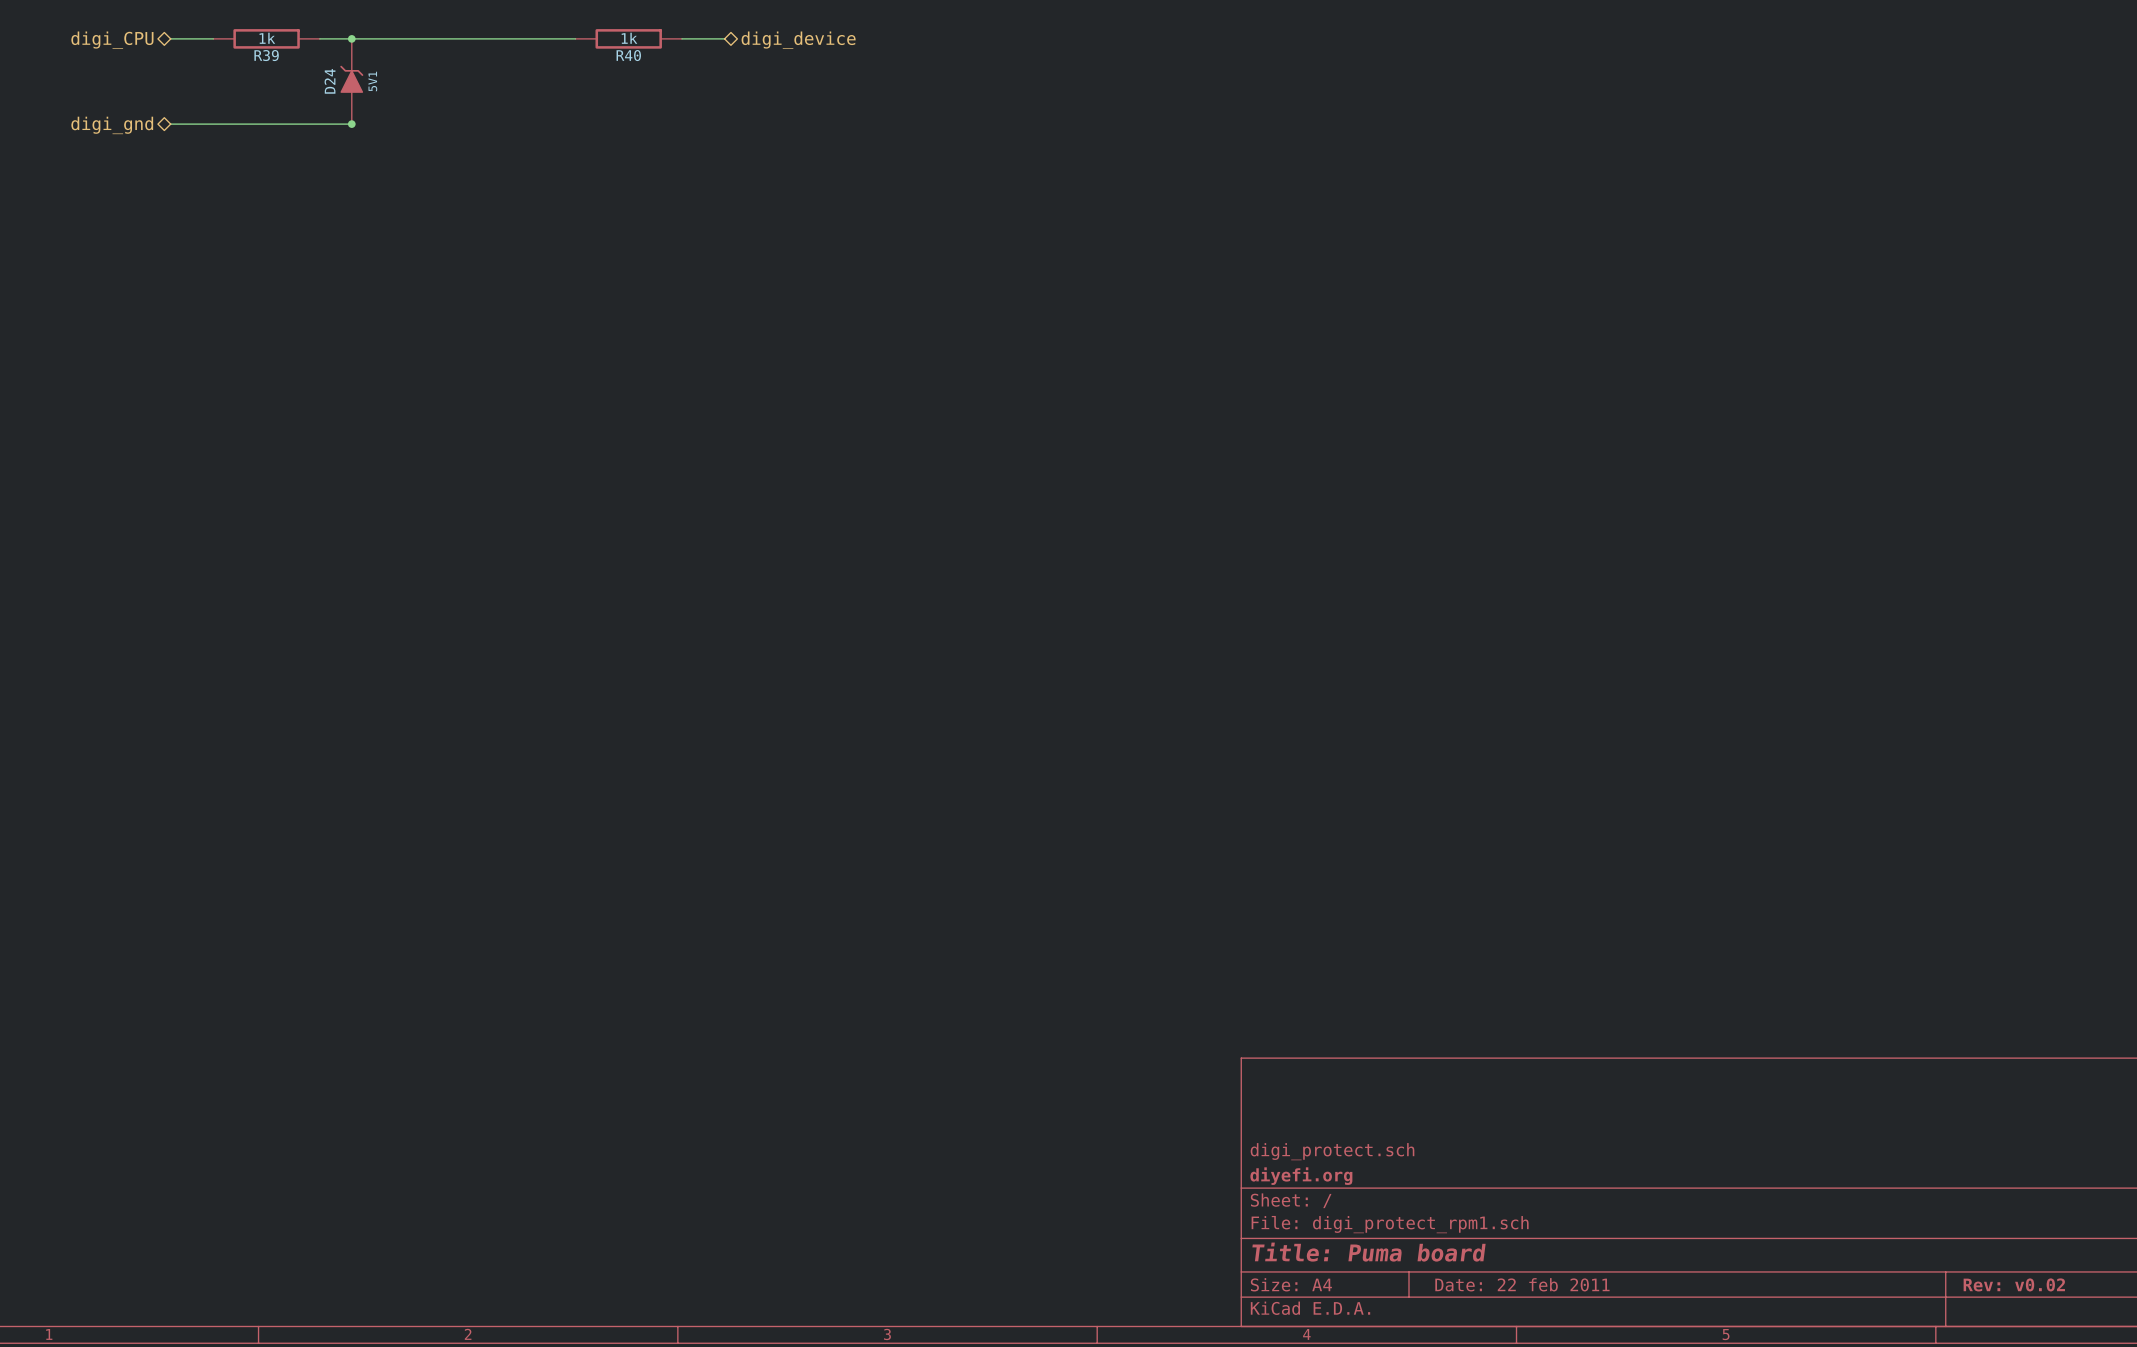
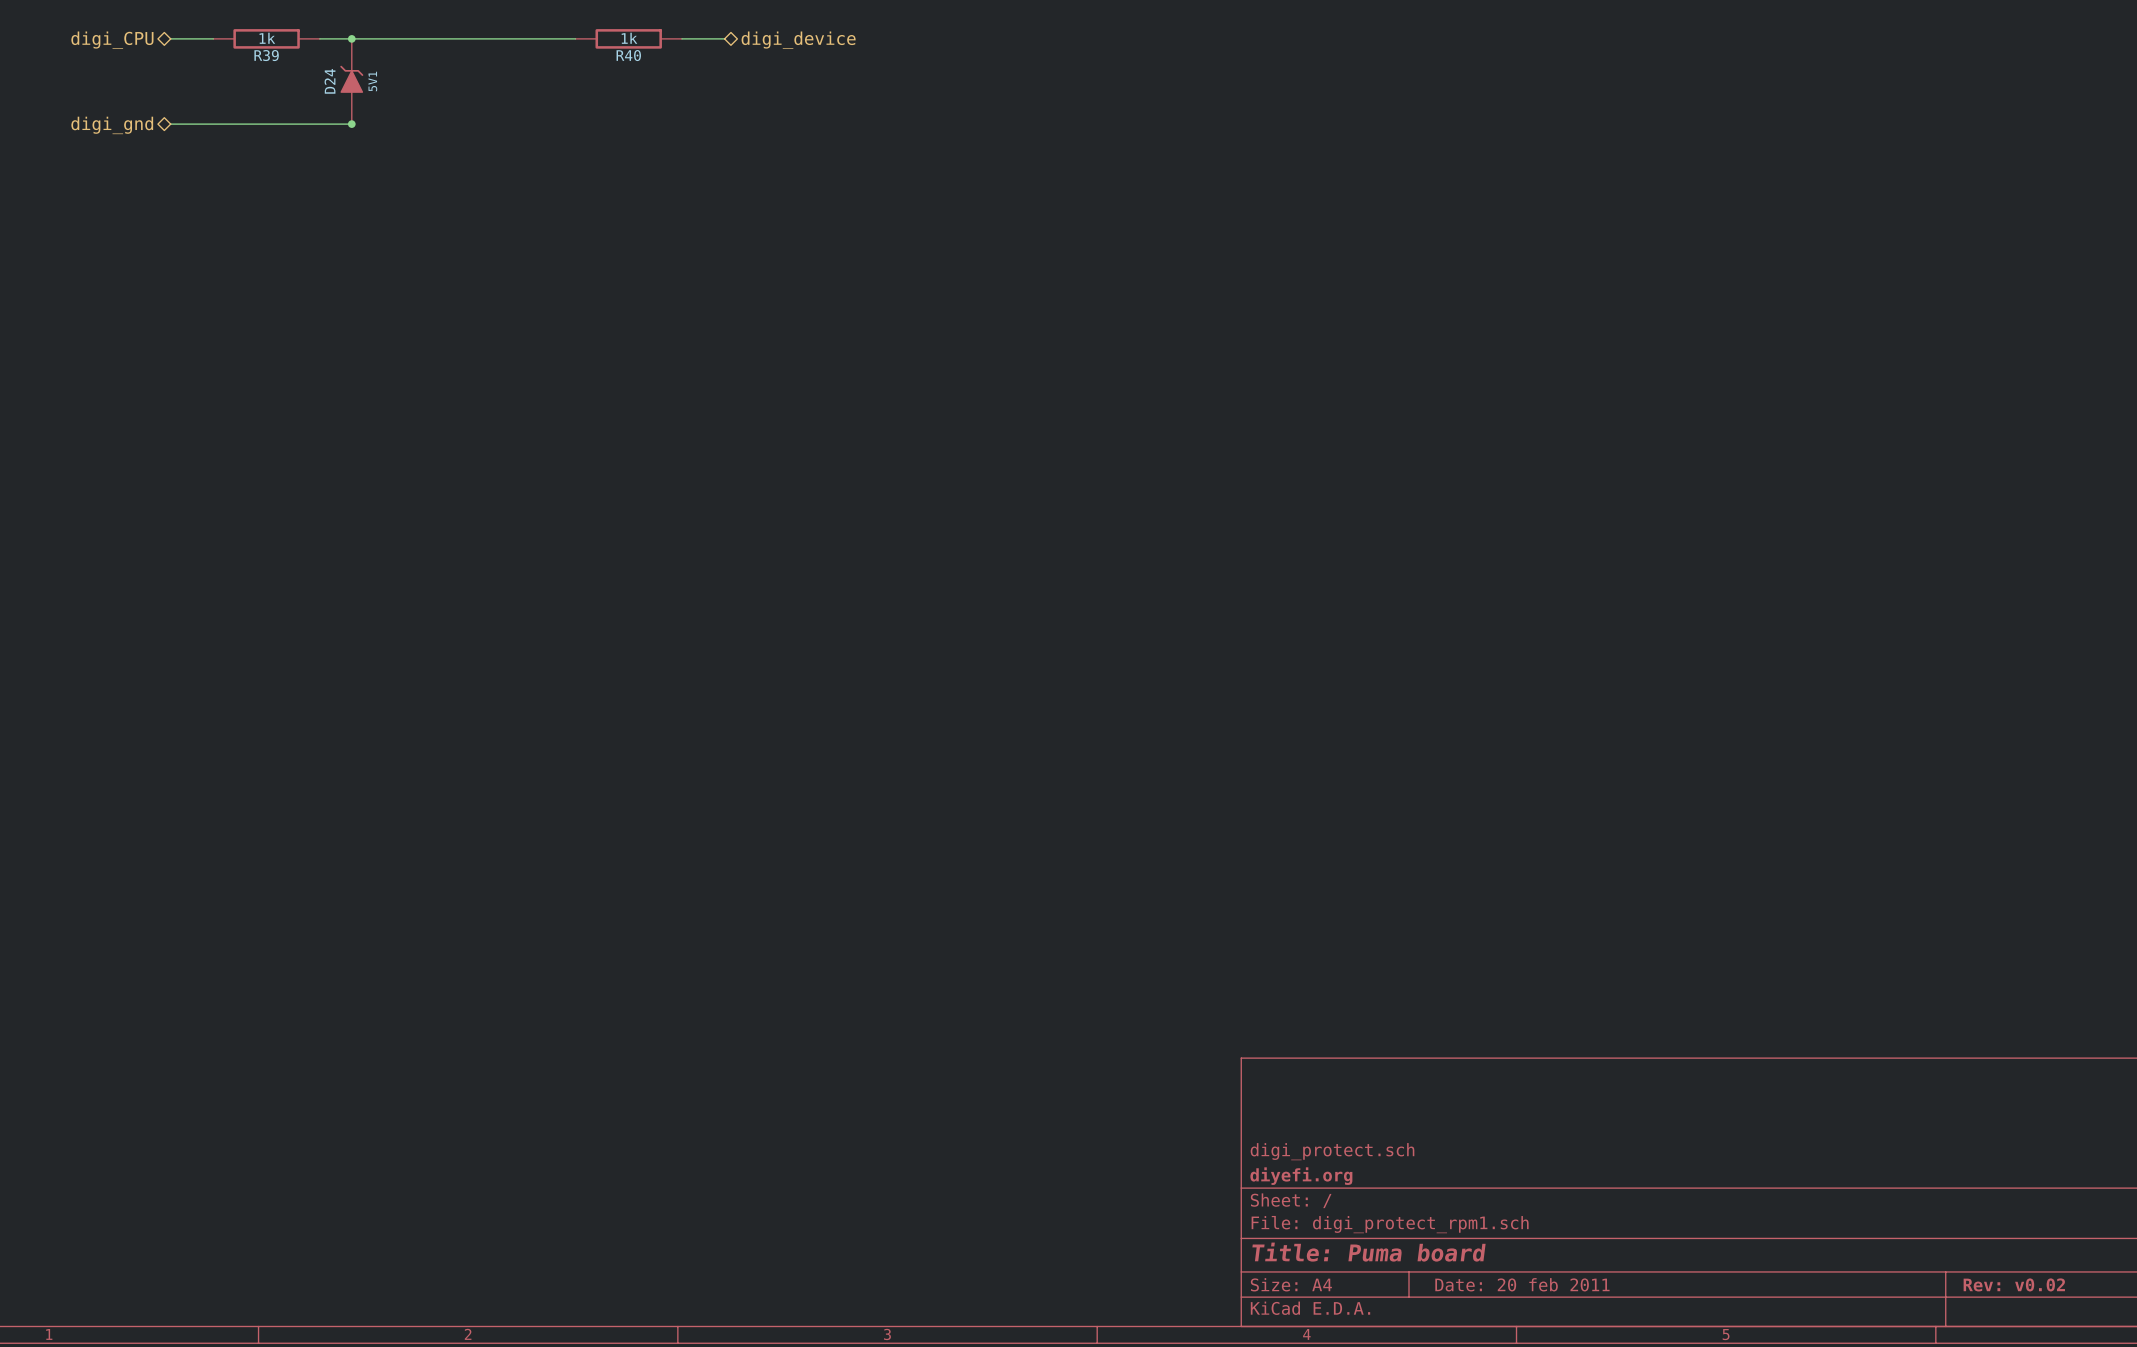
title block: Date: 22 feb 2011 (1522, 1284) -> Date: 20 feb 2011 (1522, 1284)

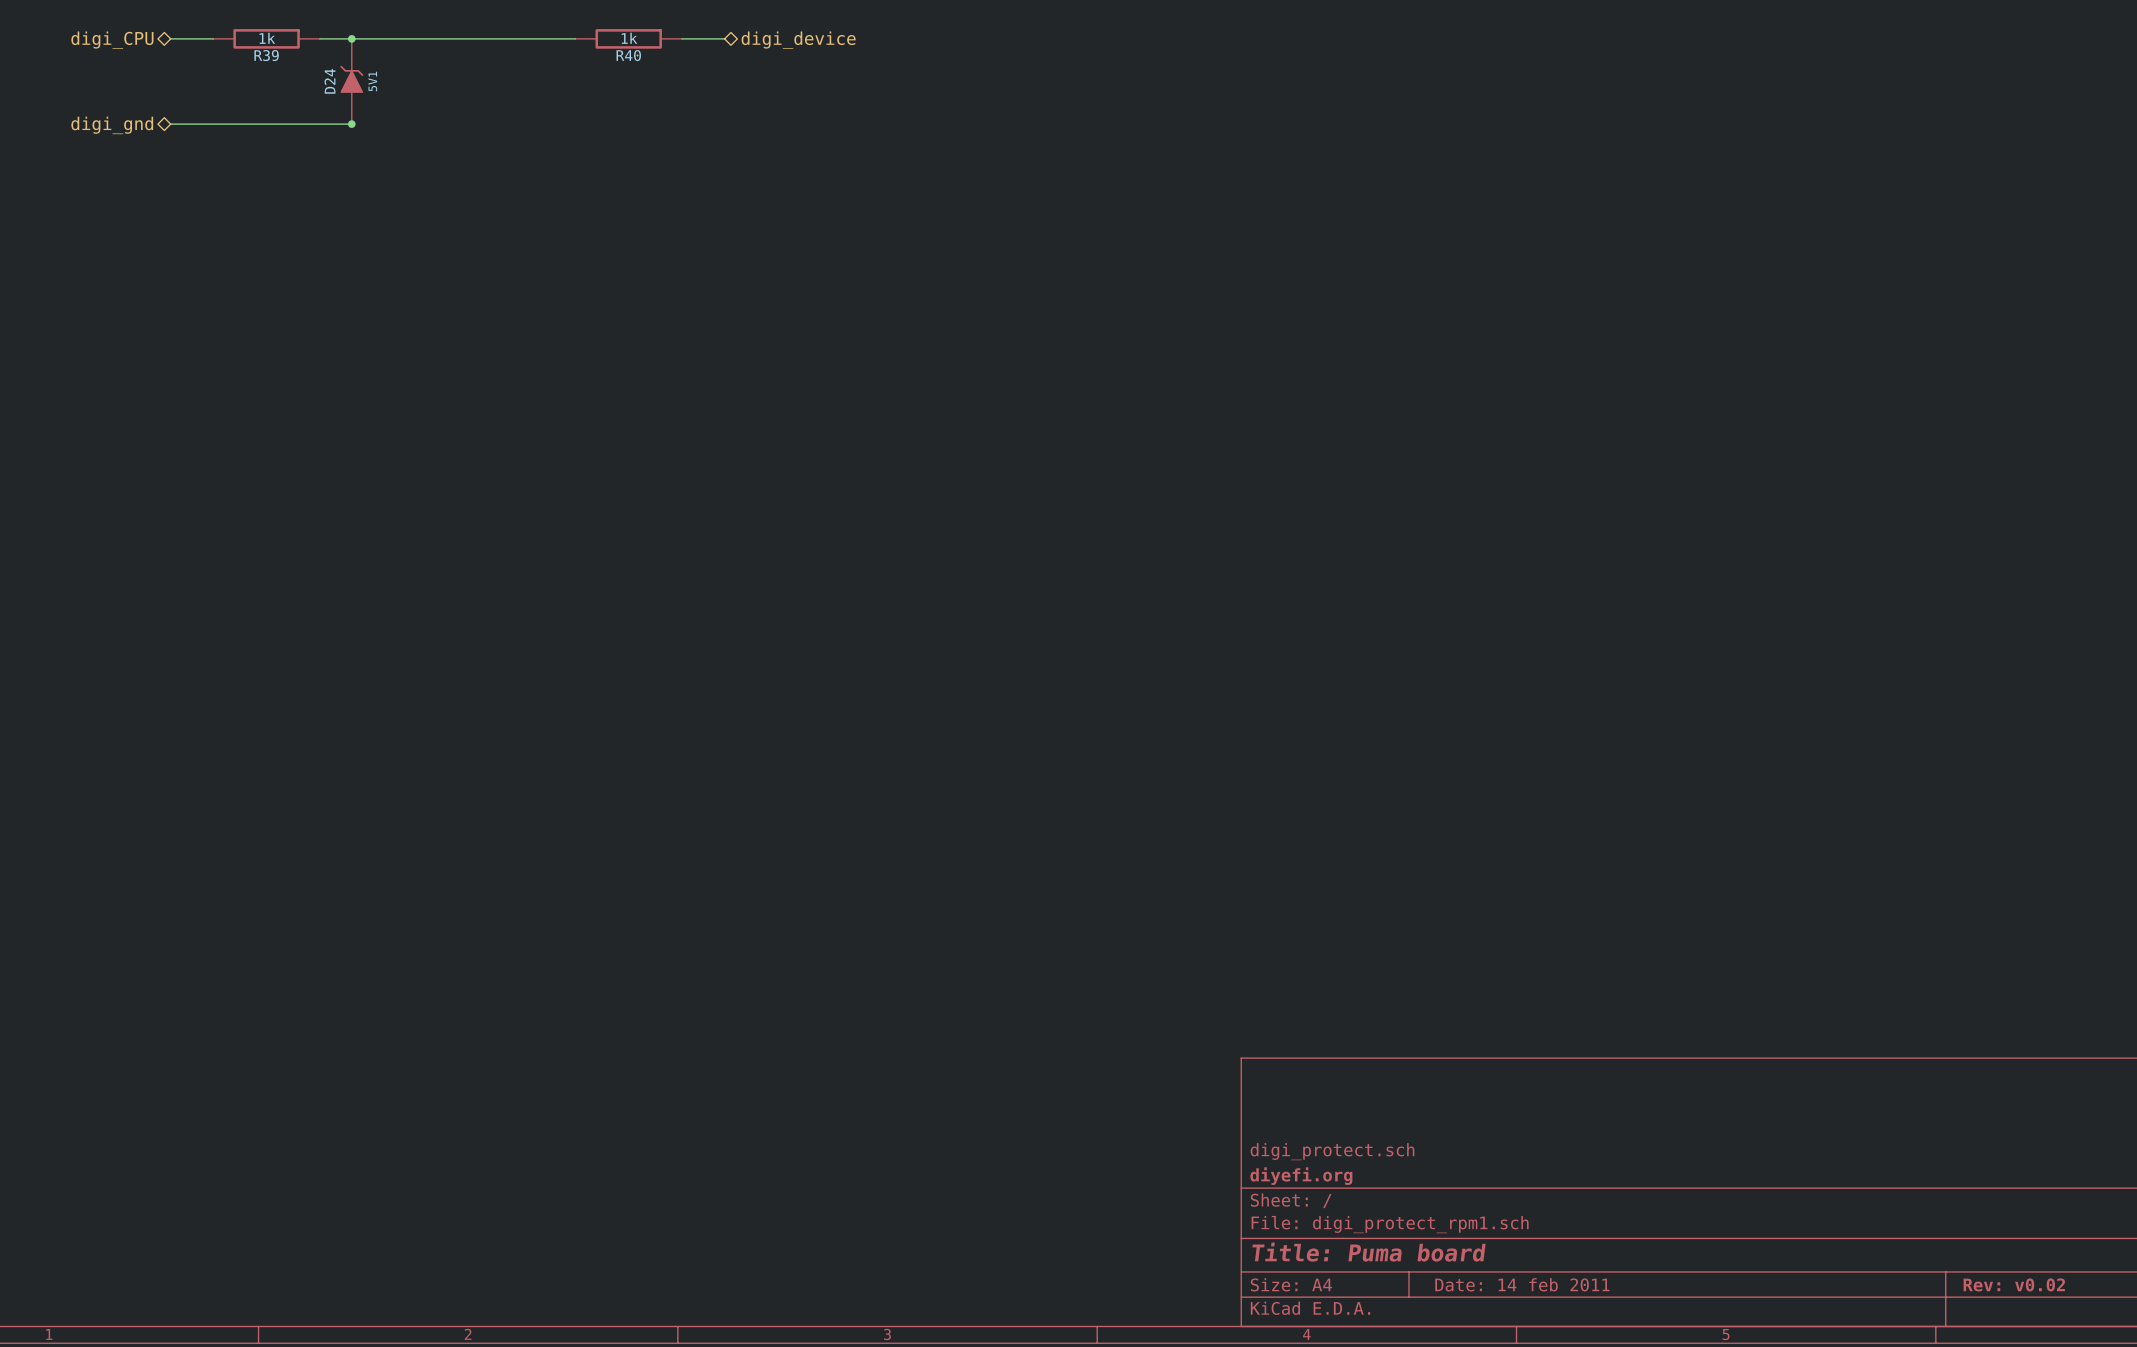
title block: Date: 20 feb 2011 (1522, 1284) -> Date: 14 feb 2011 (1522, 1284)

